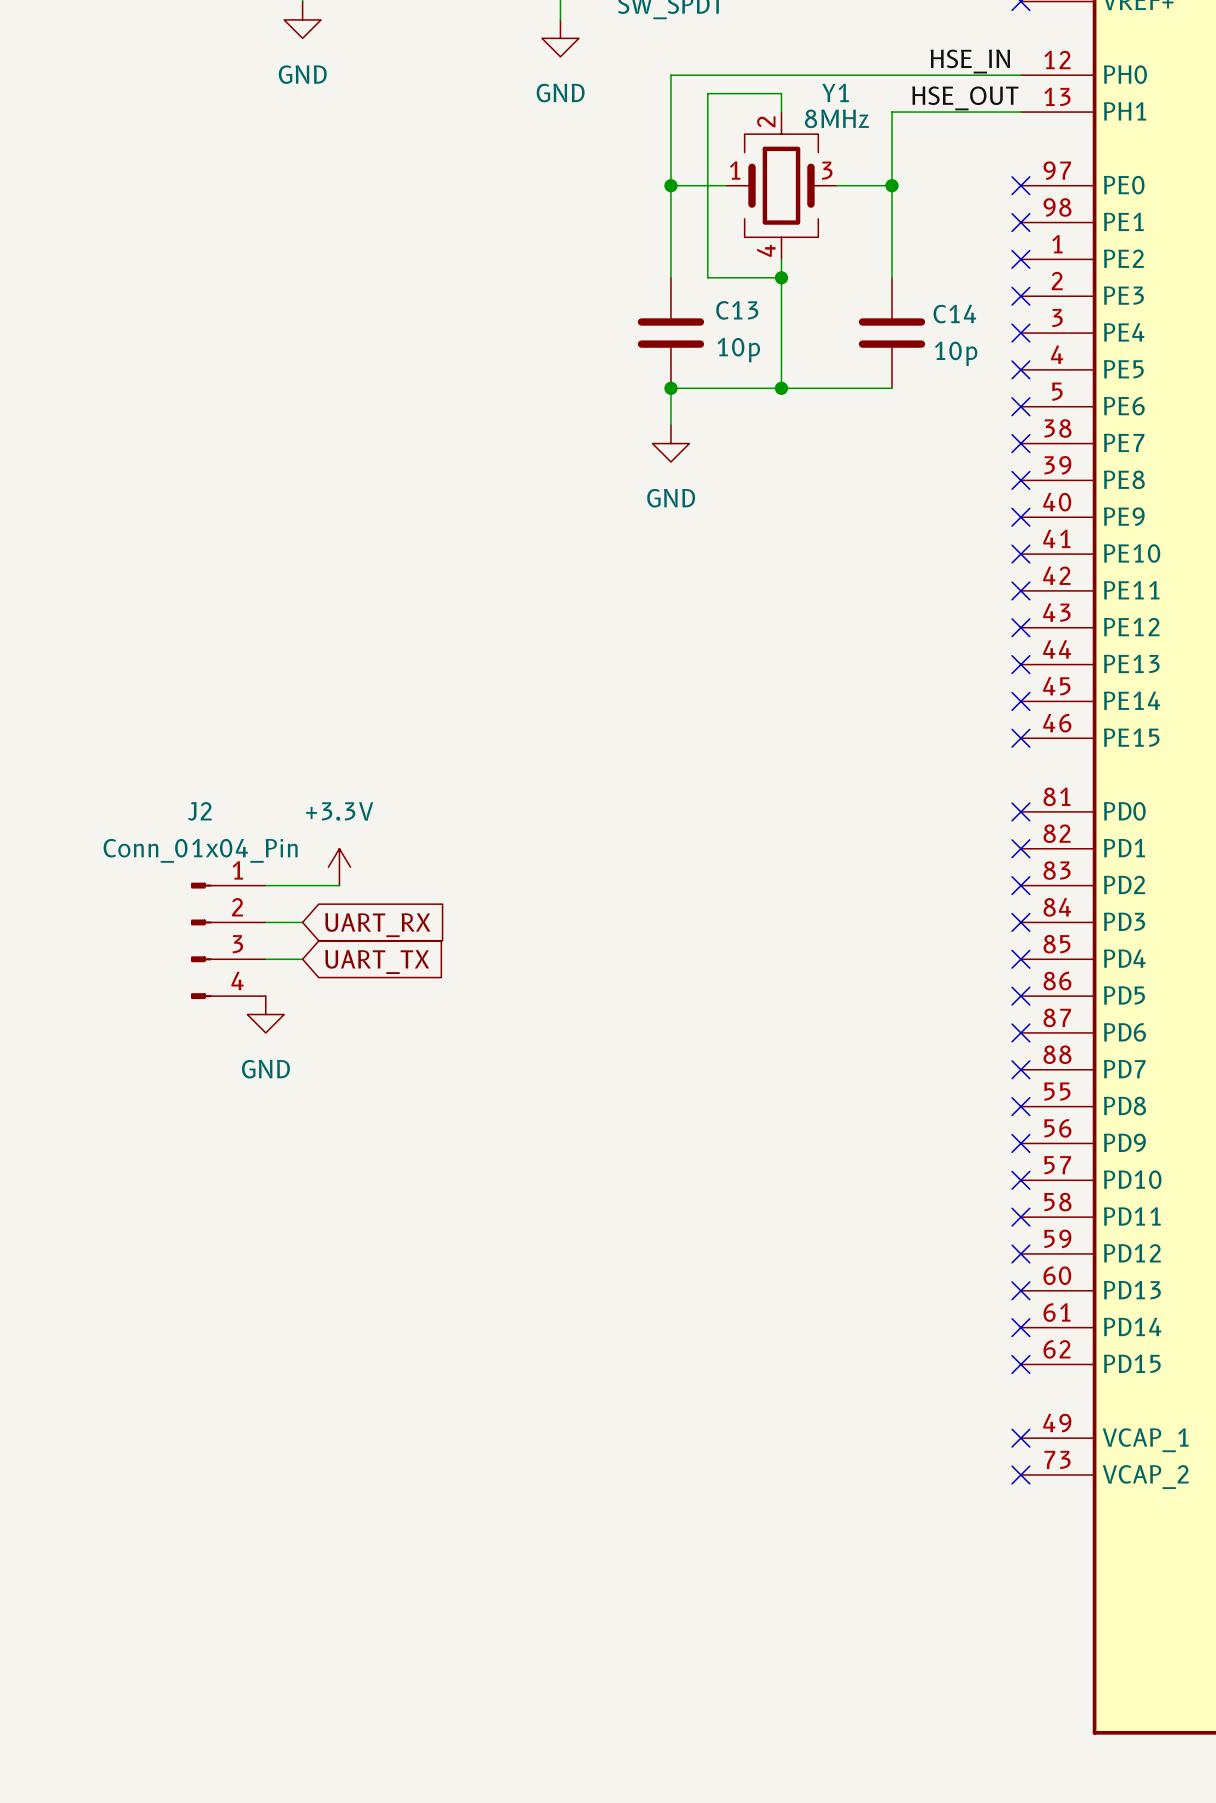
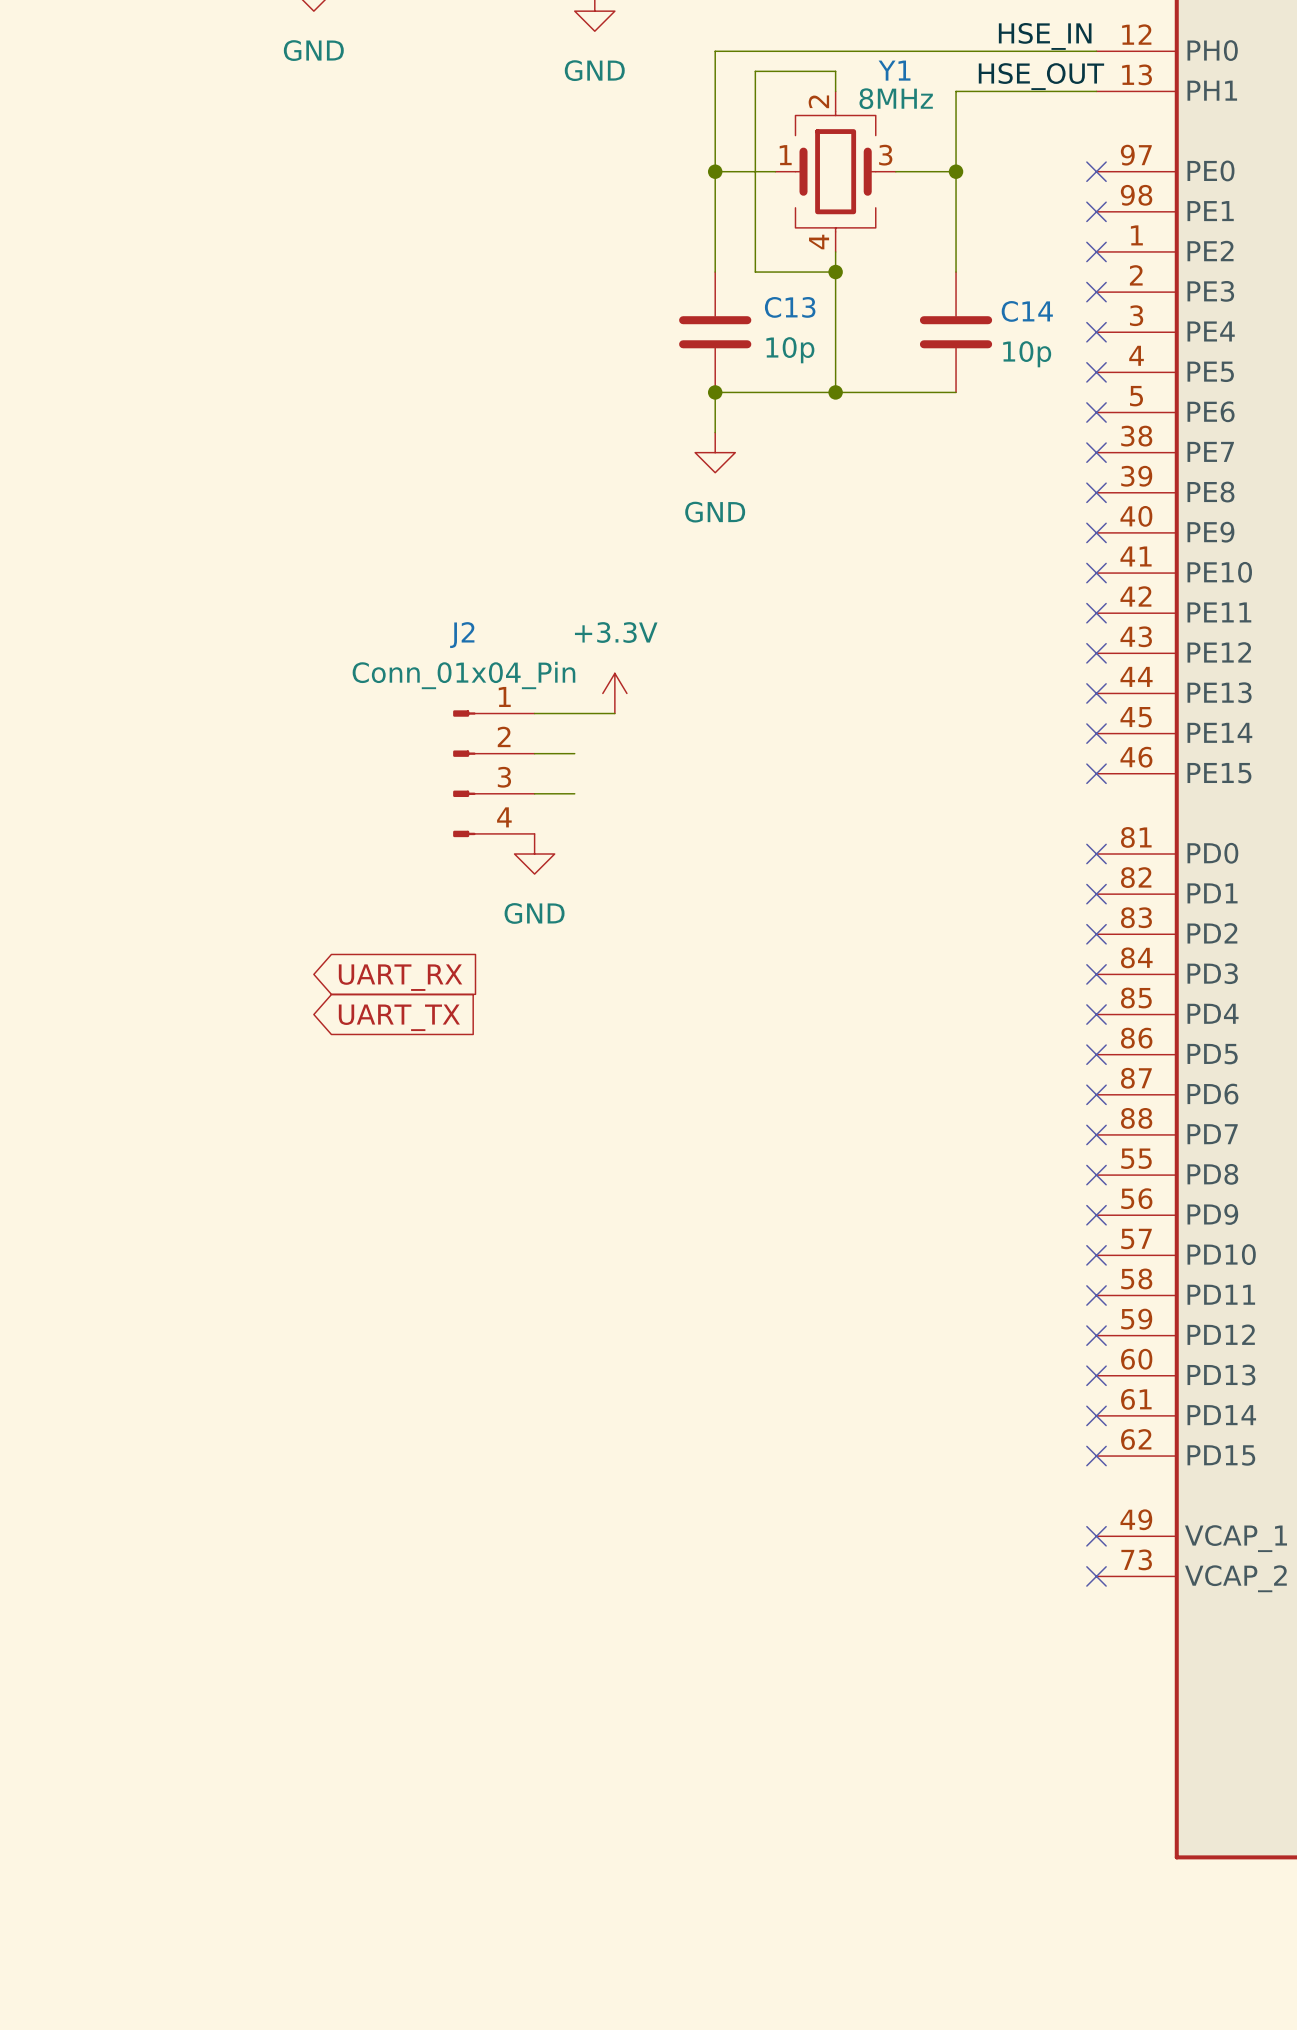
power symbol position: +3.3V (339, 867) -> +3.3V (614, 693)
wire: (265, 885) (339, 885) -> (534, 713) (614, 713)
wire: (265, 922) (302, 922) -> (534, 753) (574, 753)
J2 position: (228, 940) -> (493, 773)
wire: (265, 959) (302, 959) -> (534, 793) (574, 793)
power symbol position: GND (265, 1014) -> GND (534, 854)

